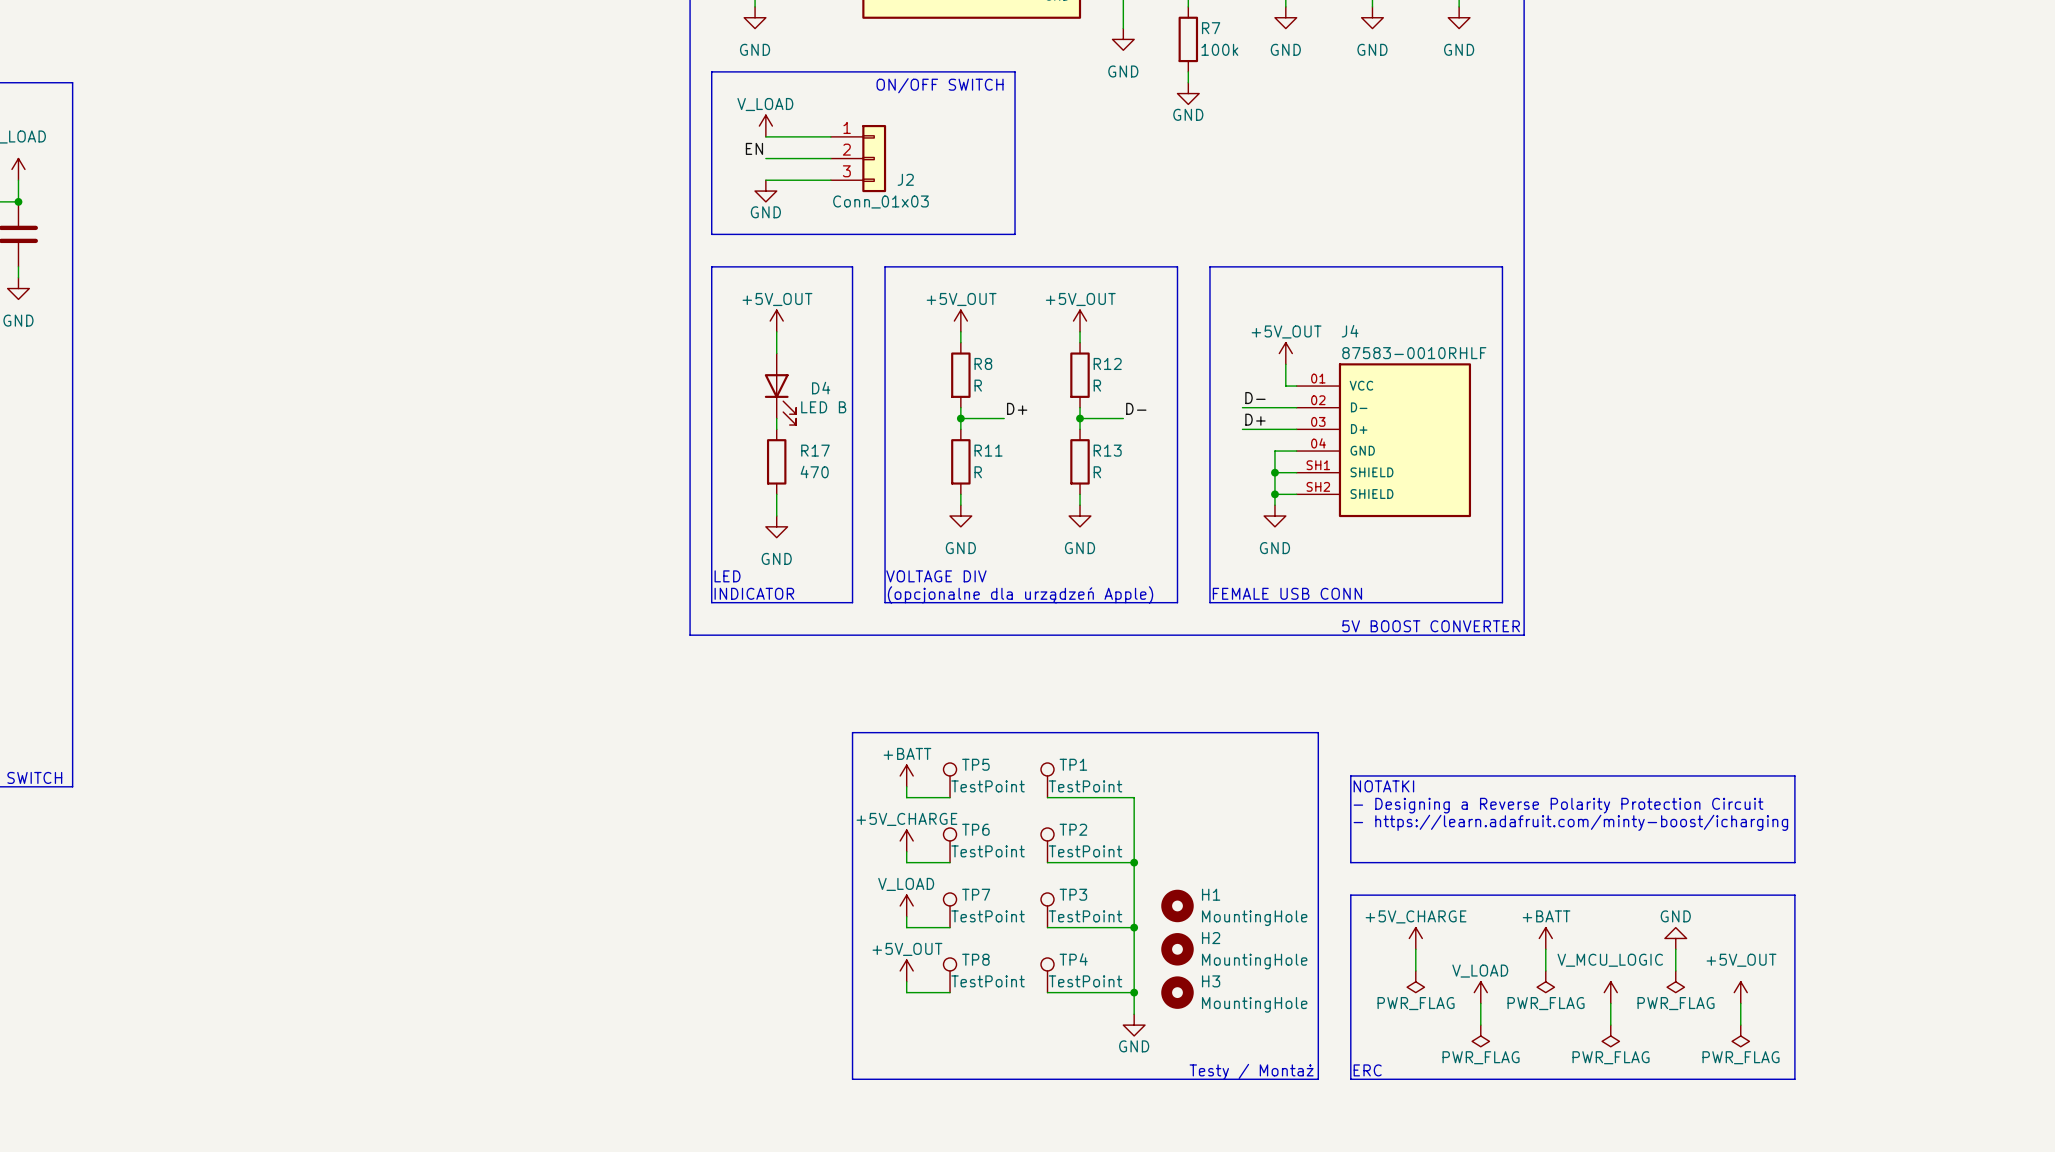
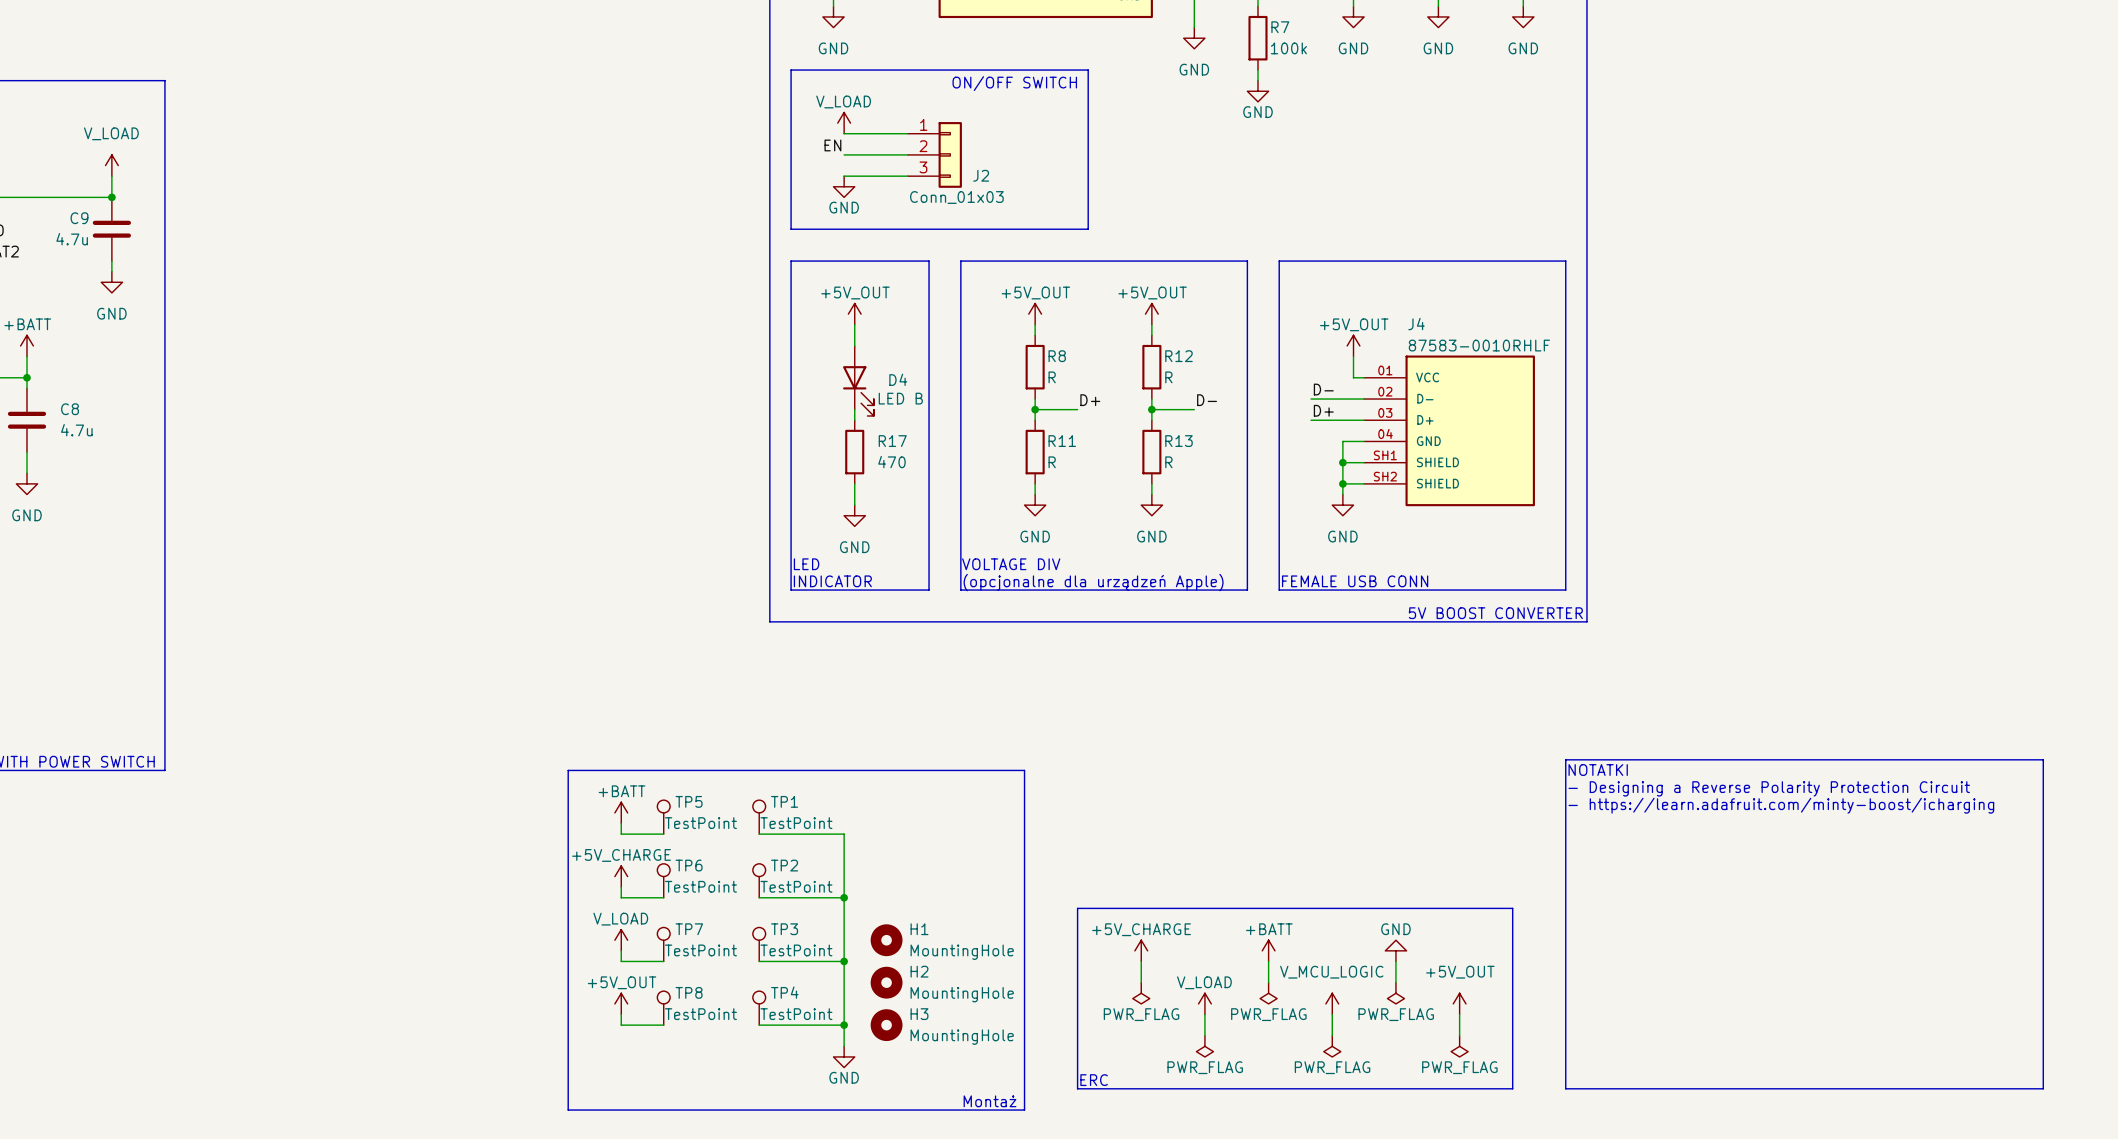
line: (852, 732) (1318, 732) (1318, 1079) (852, 1079) (852, 732) -> none
power symbol: +BATT (906, 775) -> none
line: (1502, 775) (1350, 775) (1350, 862) (1794, 862) (1794, 775) -> (1565, 759) (1565, 1088) (2043, 1088) (2043, 759) (1852, 759)
TP5 position: (950, 780) -> (663, 817)
TP1 position: (1047, 780) -> (759, 817)
line: none -> (568, 770) (1024, 770) (1024, 1110) (568, 1110) (568, 770)
wire: (906, 786) (906, 797) (950, 797) -> none
text position: NOTATKI (1383, 786) -> NOTATKI (1598, 770)
wire: (1047, 797) (1134, 797) (1134, 1014) -> none
text position: - Designing a Reverse Polarity Protection Circuit (1558, 805) -> - Designing a Reverse Polarity Protection Circuit (1769, 788)
text position: - https://learn.adafruit.com/minty-boost/icharging (1570, 822) -> - https://learn.adafruit.com/minty-boost/icharging (1781, 805)
power symbol: none -> +BATT (621, 812)
wire: none -> (621, 823) (621, 834) (663, 834)
power symbol: +5V_CHARGE (906, 840) -> none
TP6 position: (950, 845) -> (663, 880)
TP2 position: (1047, 845) -> (759, 880)
wire: none -> (759, 834) (844, 834) (844, 1046)
wire: (906, 851) (906, 862) (950, 862) -> none
wire: (1047, 862) (1134, 862) -> none
junction: (1134, 862) -> none
power symbol: none -> +5V_CHARGE (621, 876)
line: (1350, 895) (1794, 895) (1794, 1079) (1350, 1079) (1350, 895) -> none
wire: none -> (621, 887) (621, 897) (663, 897)
power symbol: V_LOAD (906, 905) -> none
H1 position: (1177, 905) -> (886, 940)
TP7 position: (950, 910) -> (663, 944)
TP3 position: (1047, 910) -> (759, 944)
wire: none -> (759, 897) (844, 897)
junction: none -> (844, 897)
wire: (906, 916) (906, 927) (950, 927) -> none
line: none -> (1077, 908) (1512, 908) (1512, 1088) (1077, 1088) (1077, 908)
junction: (1134, 927) -> none
power symbol: +5V_CHARGE (1415, 938) -> none
power symbol: +BATT (1545, 938) -> none
power symbol: GND (1675, 938) -> none
H2 position: (1177, 949) -> (886, 982)
wire: (1415, 949) (1415, 970) -> (1395, 961) (1395, 982)
wire: (1545, 949) (1545, 970) -> none
wire: (1675, 949) (1675, 970) -> none
power symbol: none -> V_LOAD (621, 940)
wire: none -> (621, 950) (621, 961) (663, 961)
power symbol: +5V_OUT (906, 970) -> none
power symbol: none -> +5V_CHARGE (1141, 950)
power symbol: none -> +BATT (1268, 950)
power symbol: none -> GND (1395, 950)
TP8 position: (950, 975) -> (663, 1008)
TP4 position: (1047, 975) -> (759, 1008)
wire: none -> (759, 961) (844, 961)
junction: none -> (844, 961)
wire: (906, 981) (906, 992) (950, 992) -> none
wire: none -> (1141, 961) (1141, 982)
wire: none -> (1268, 961) (1268, 982)
power symbol: PWR_FLAG (1415, 981) -> none
power symbol: PWR_FLAG (1545, 981) -> none
power symbol: PWR_FLAG (1675, 981) -> none
wire: (1047, 992) (1134, 992) -> none
junction: (1134, 992) -> none
H3 position: (1177, 992) -> (886, 1025)
power symbol: V_LOAD (1480, 992) -> none
power symbol: V_MCU_LOGIC (1610, 992) -> none
power symbol: +5V_OUT (1740, 992) -> none
wire: (1480, 1003) (1480, 1025) -> (1459, 1014) (1459, 1035)
wire: (1610, 1003) (1610, 1025) -> none
wire: (1740, 1003) (1740, 1025) -> none
power symbol: none -> PWR_FLAG (1141, 993)
power symbol: none -> PWR_FLAG (1268, 993)
power symbol: none -> PWR_FLAG (1395, 993)
power symbol: none -> +5V_OUT (621, 1003)
power symbol: GND (1134, 1025) -> V_LOAD (1204, 1003)
power symbol: none -> V_MCU_LOGIC (1332, 1003)
power symbol: none -> +5V_OUT (1459, 1003)
wire: none -> (621, 1014) (621, 1025) (663, 1025)
wire: none -> (1204, 1014) (1204, 1035)
wire: none -> (1332, 1014) (1332, 1035)
power symbol: PWR_FLAG (1480, 1035) -> none
power symbol: PWR_FLAG (1610, 1035) -> none
power symbol: PWR_FLAG (1740, 1035) -> none
wire: none -> (759, 1025) (844, 1025)
junction: none -> (844, 1025)
power symbol: none -> PWR_FLAG (1204, 1046)
power symbol: none -> PWR_FLAG (1332, 1046)
power symbol: none -> PWR_FLAG (1459, 1046)
text: ERC (1367, 1070) -> none
text: Testy / Montaż (1251, 1071) -> none
power symbol: none -> GND (844, 1056)
text: none -> ERC (1094, 1080)
text: none -> Montaż (989, 1101)

